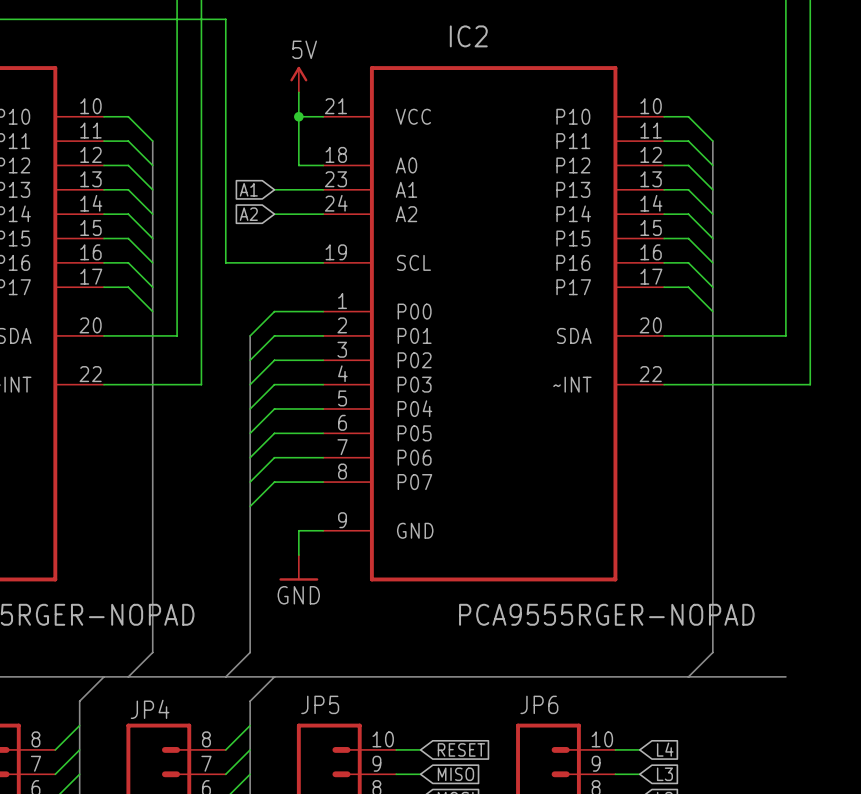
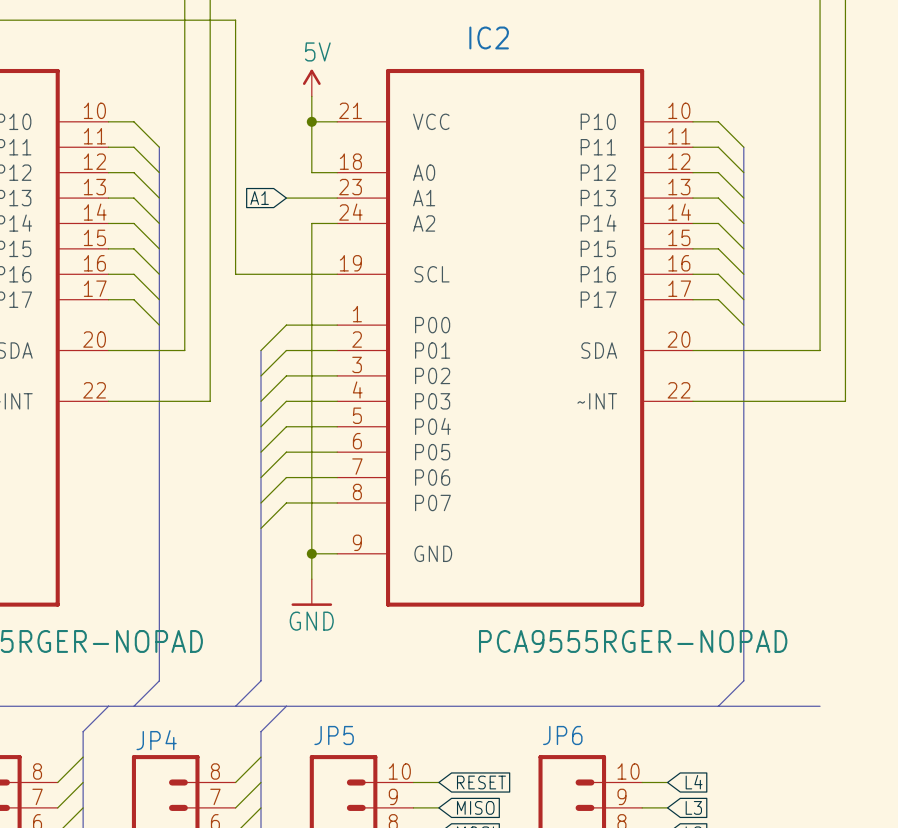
global label: A2 (248, 214) -> none
wire: (274, 214) (298, 214) -> (311, 553) (311, 223)
junction: none -> (311, 553)

